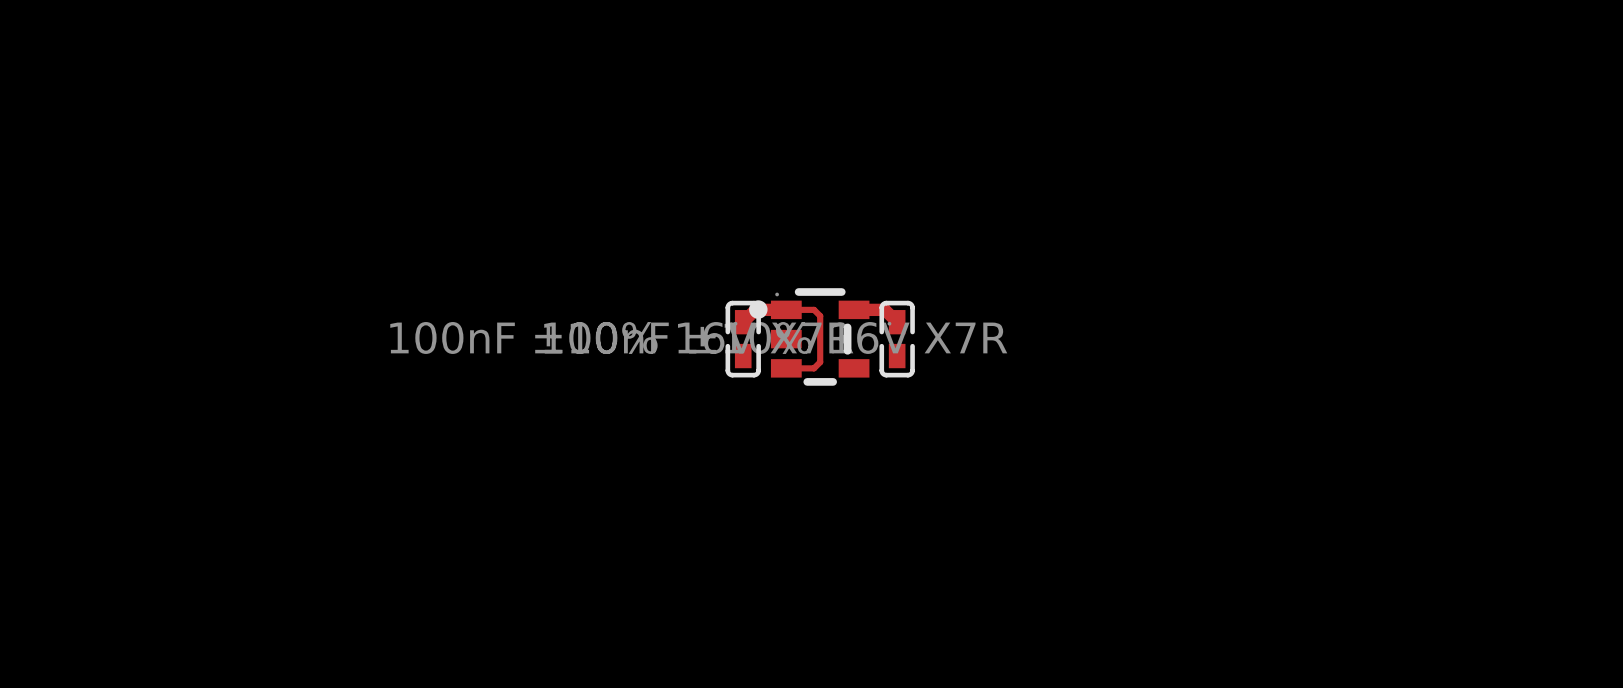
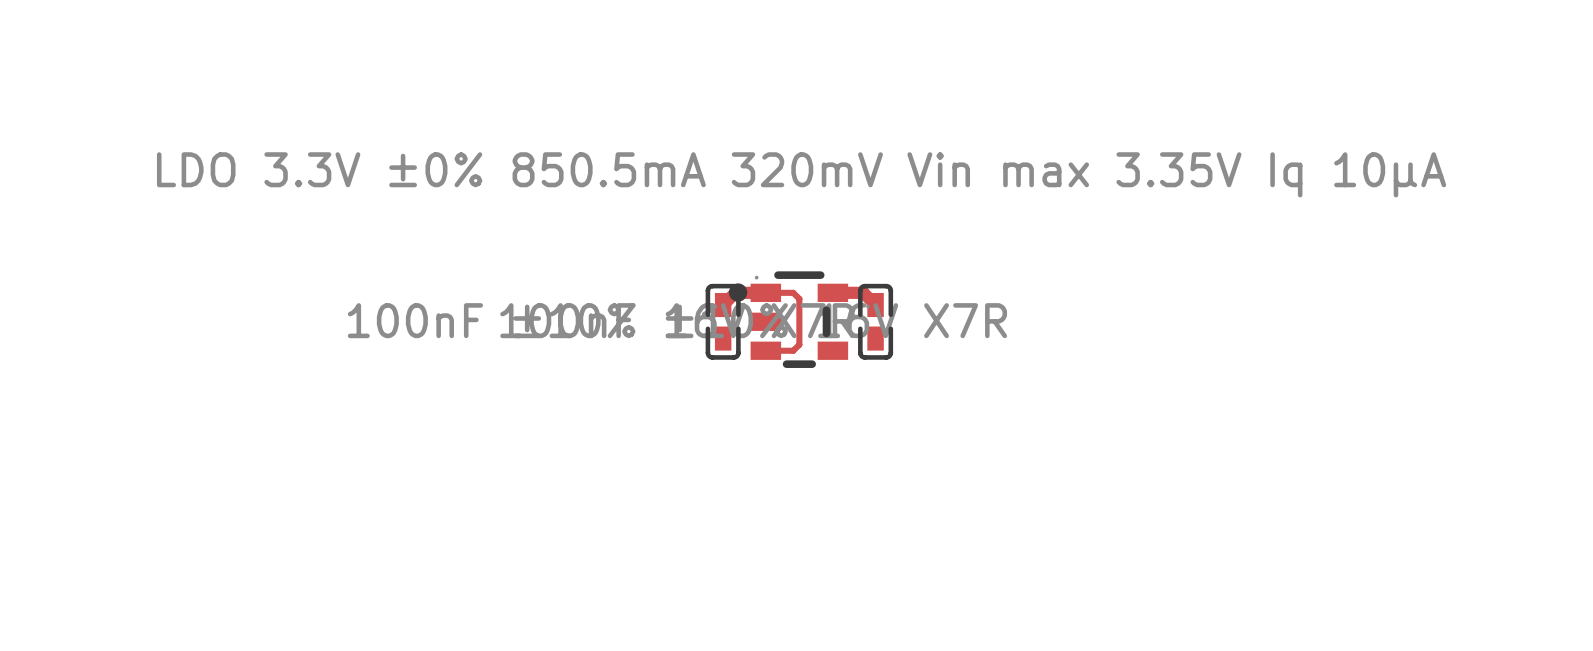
part value: none -> LDO 3.3V ±0% 850.5mA 320mV Vin max 3.35V Iq 10µA (801, 174)

